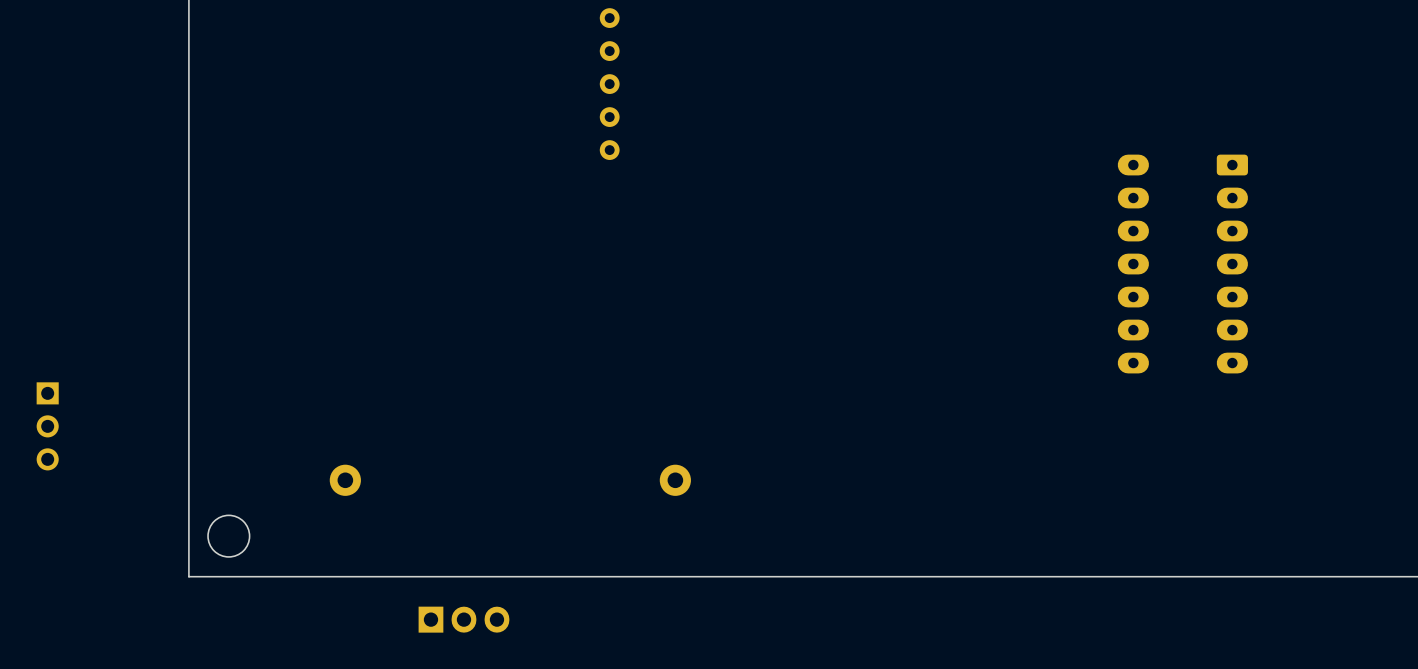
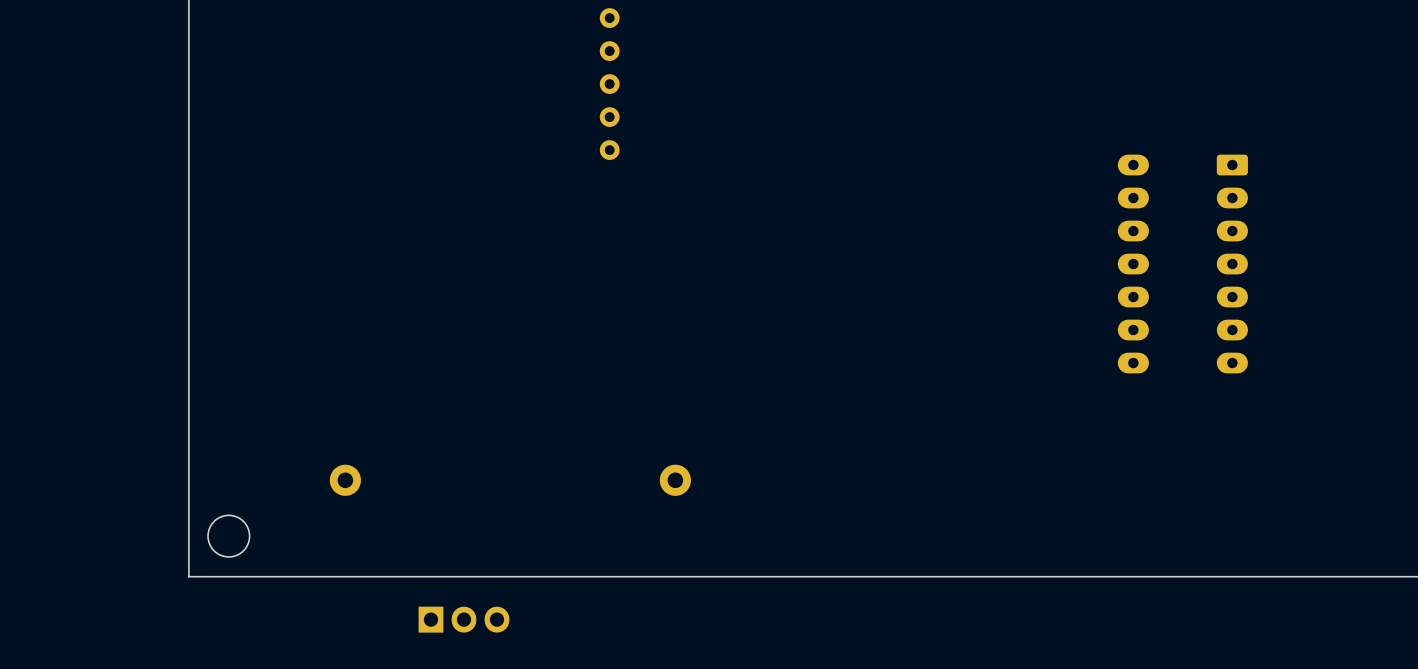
part: (47, 426) -> none

